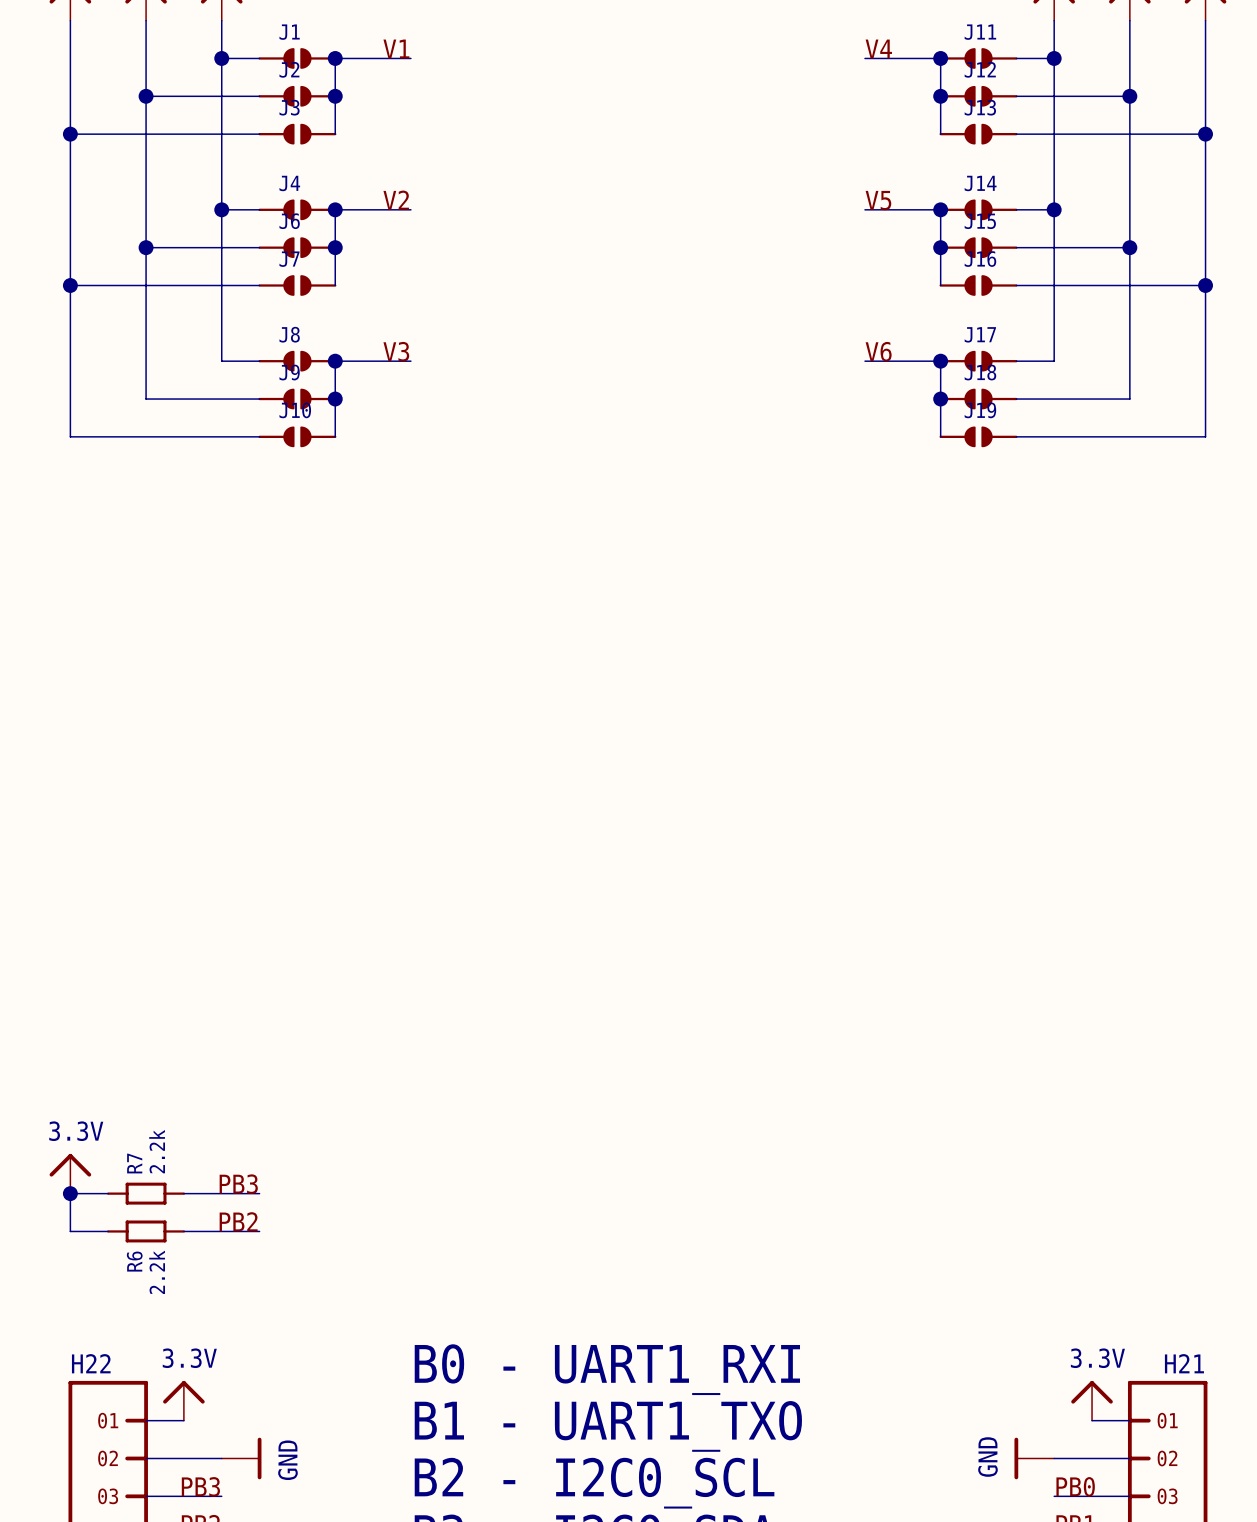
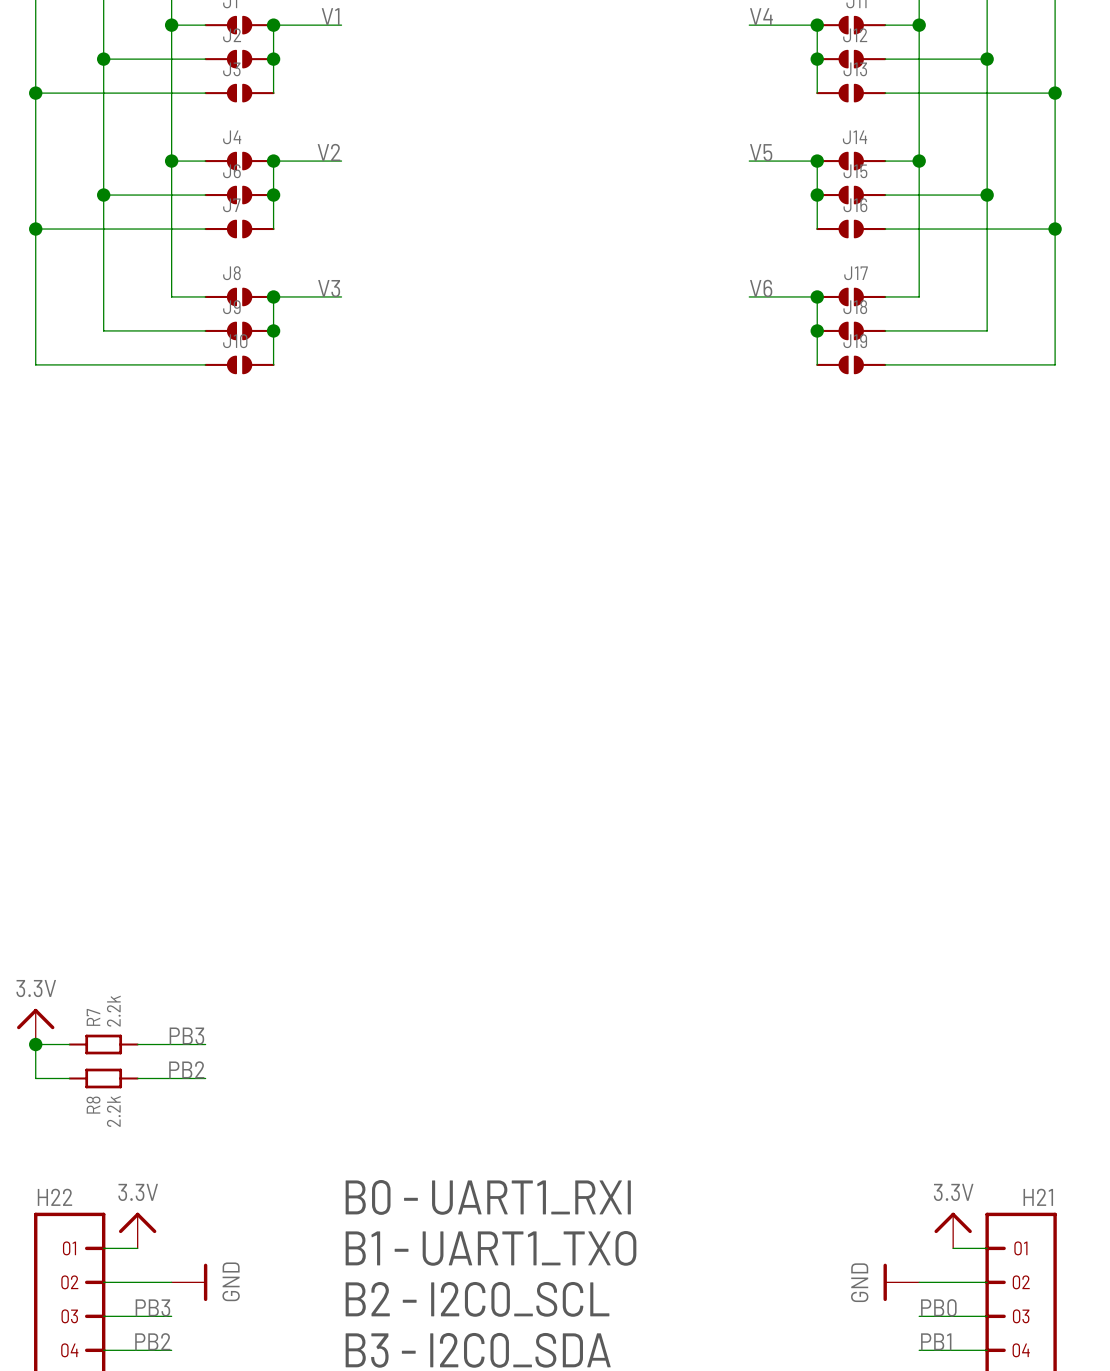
R6 name: R6 (134, 1261) -> R8 (93, 1105)

